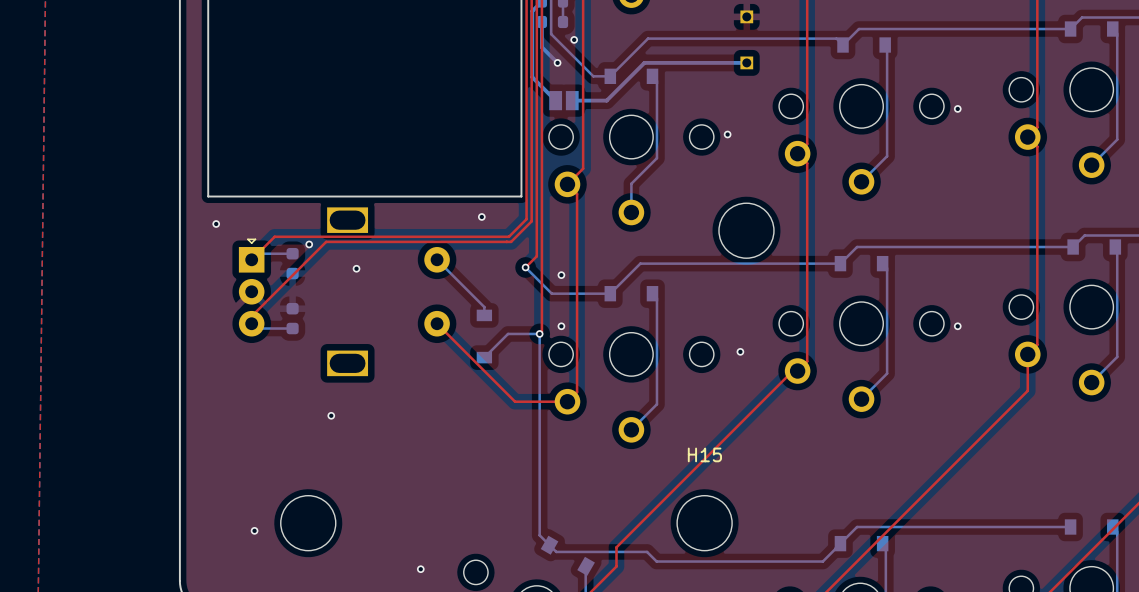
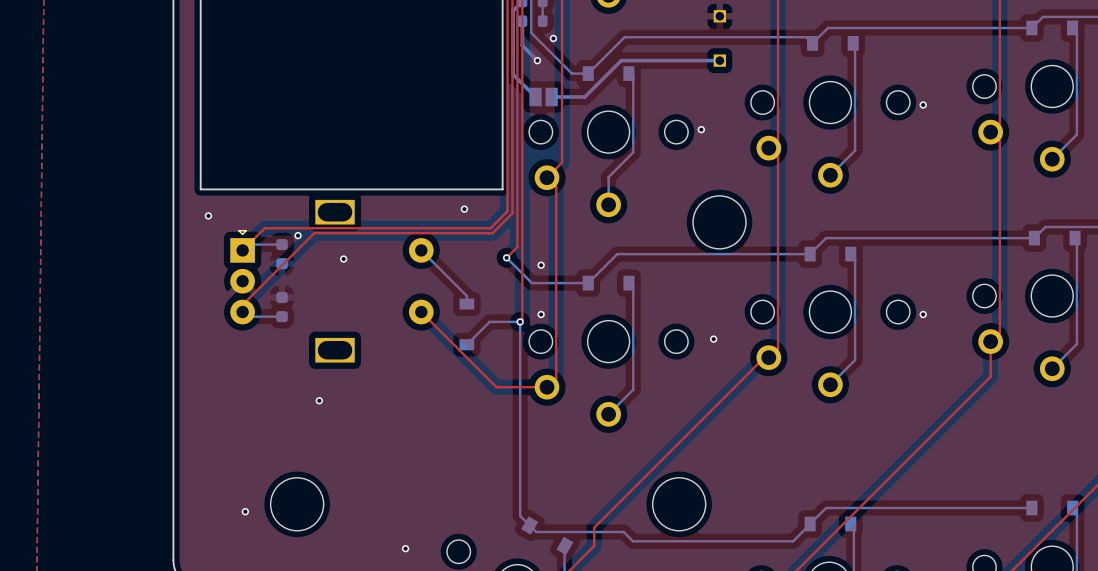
H15 name: H15 (704, 454) -> none

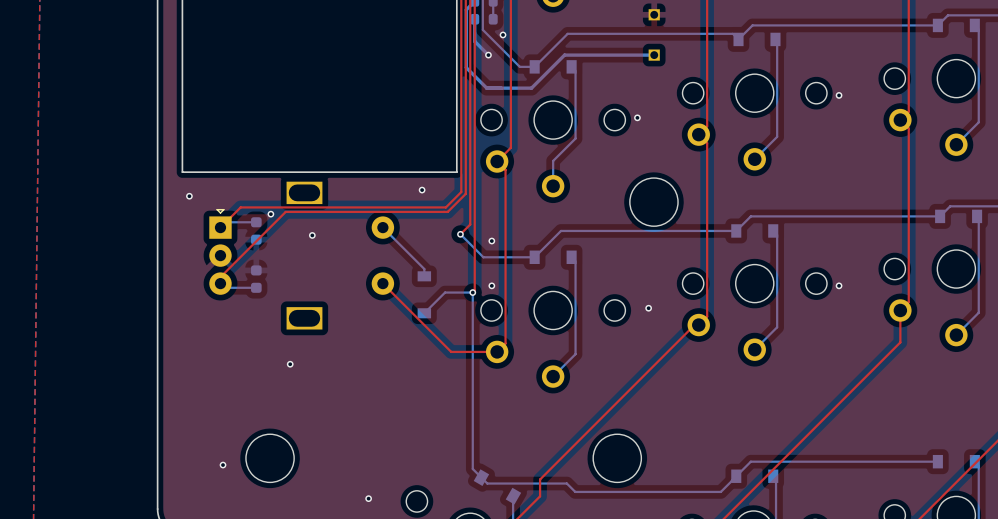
bottom track: none -> (486, 88) (501, 88)
part: (543, 96) -> none

